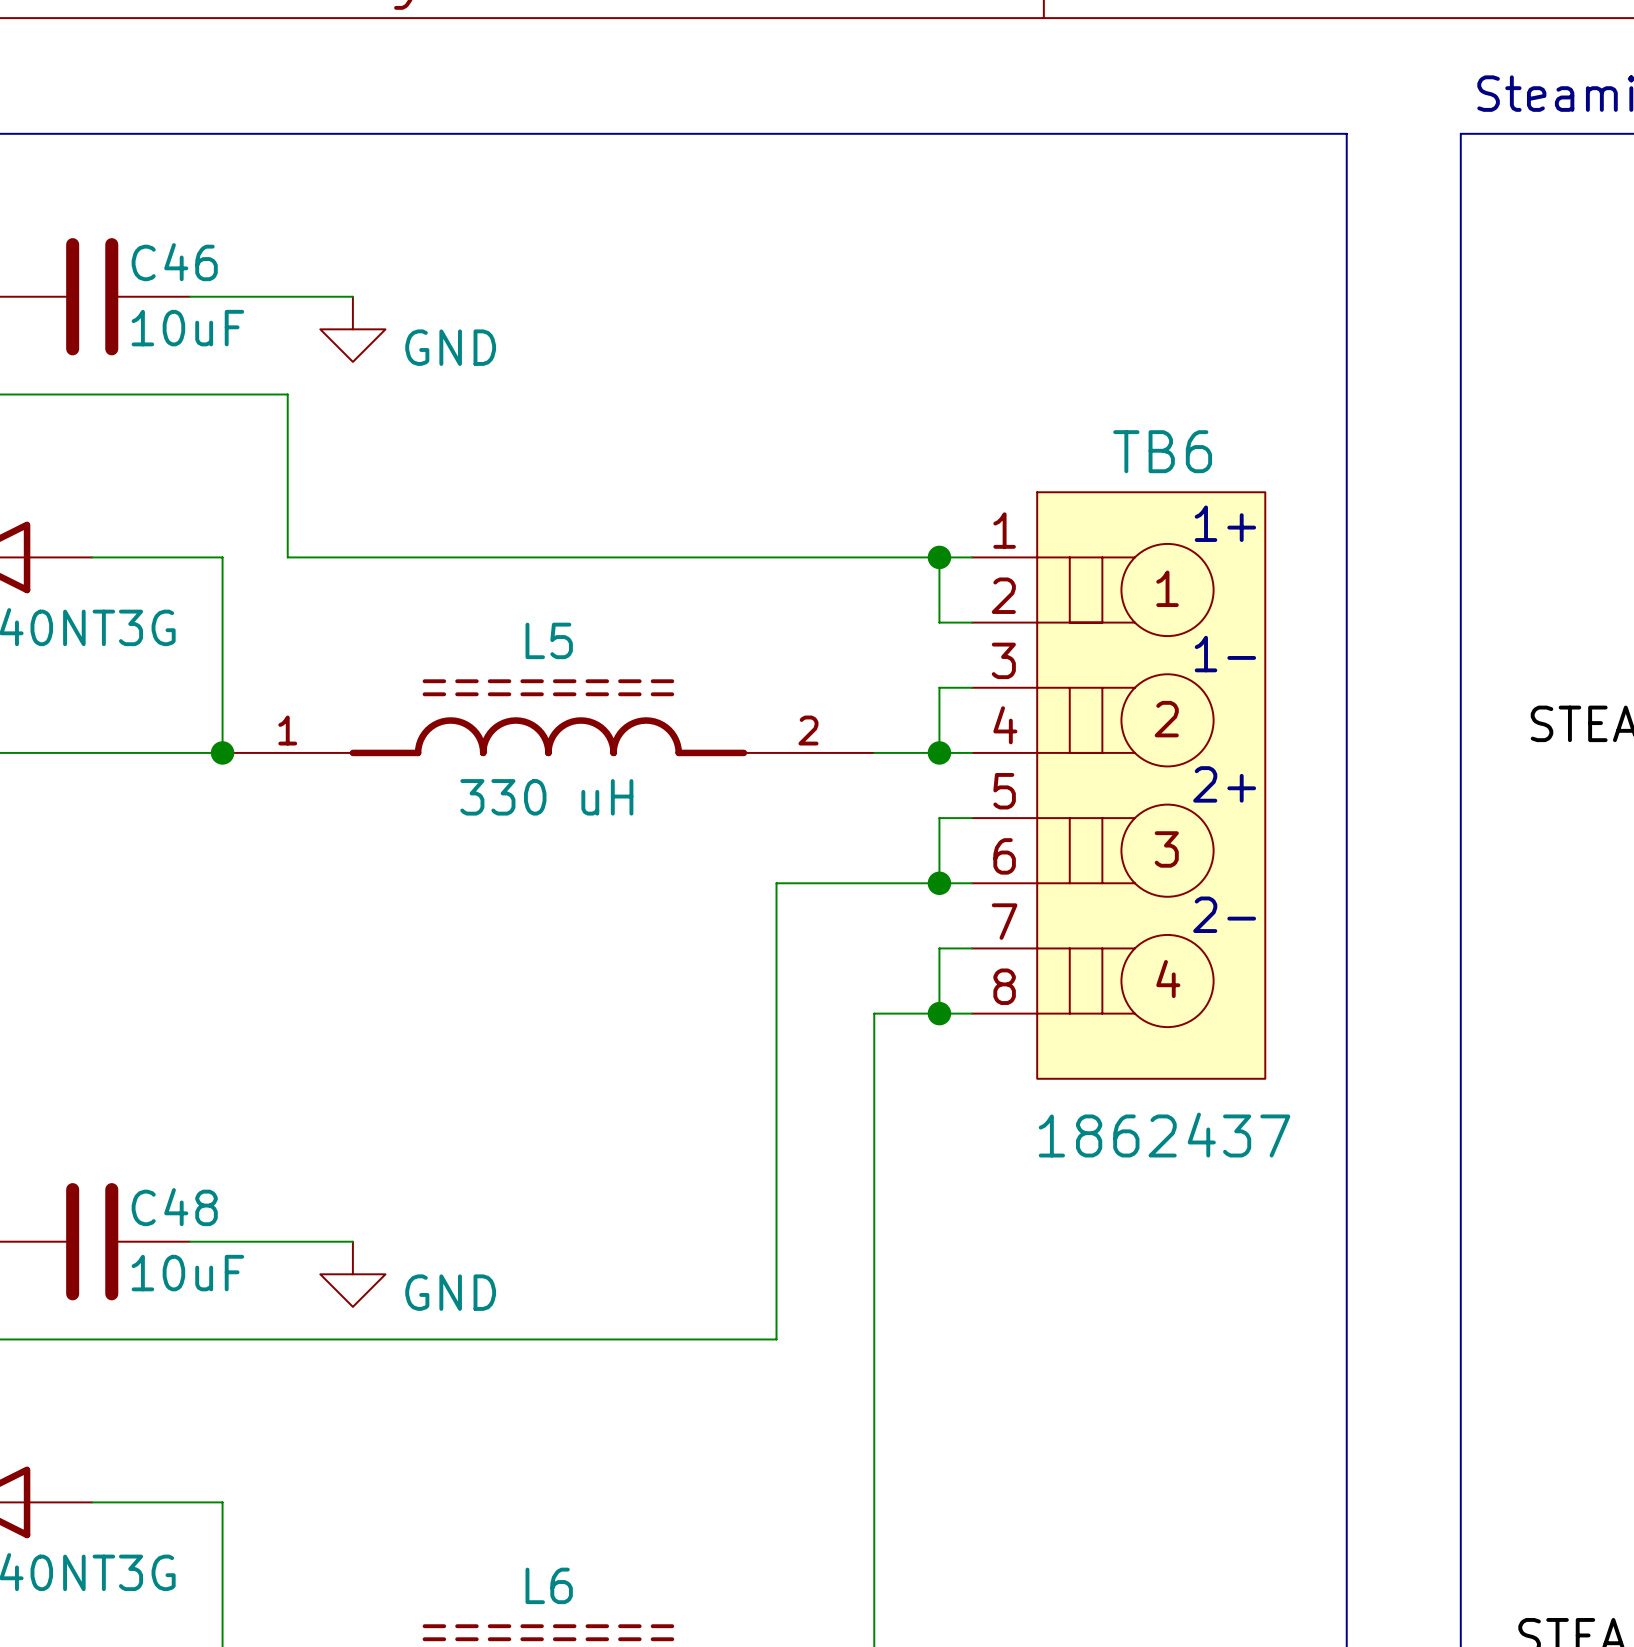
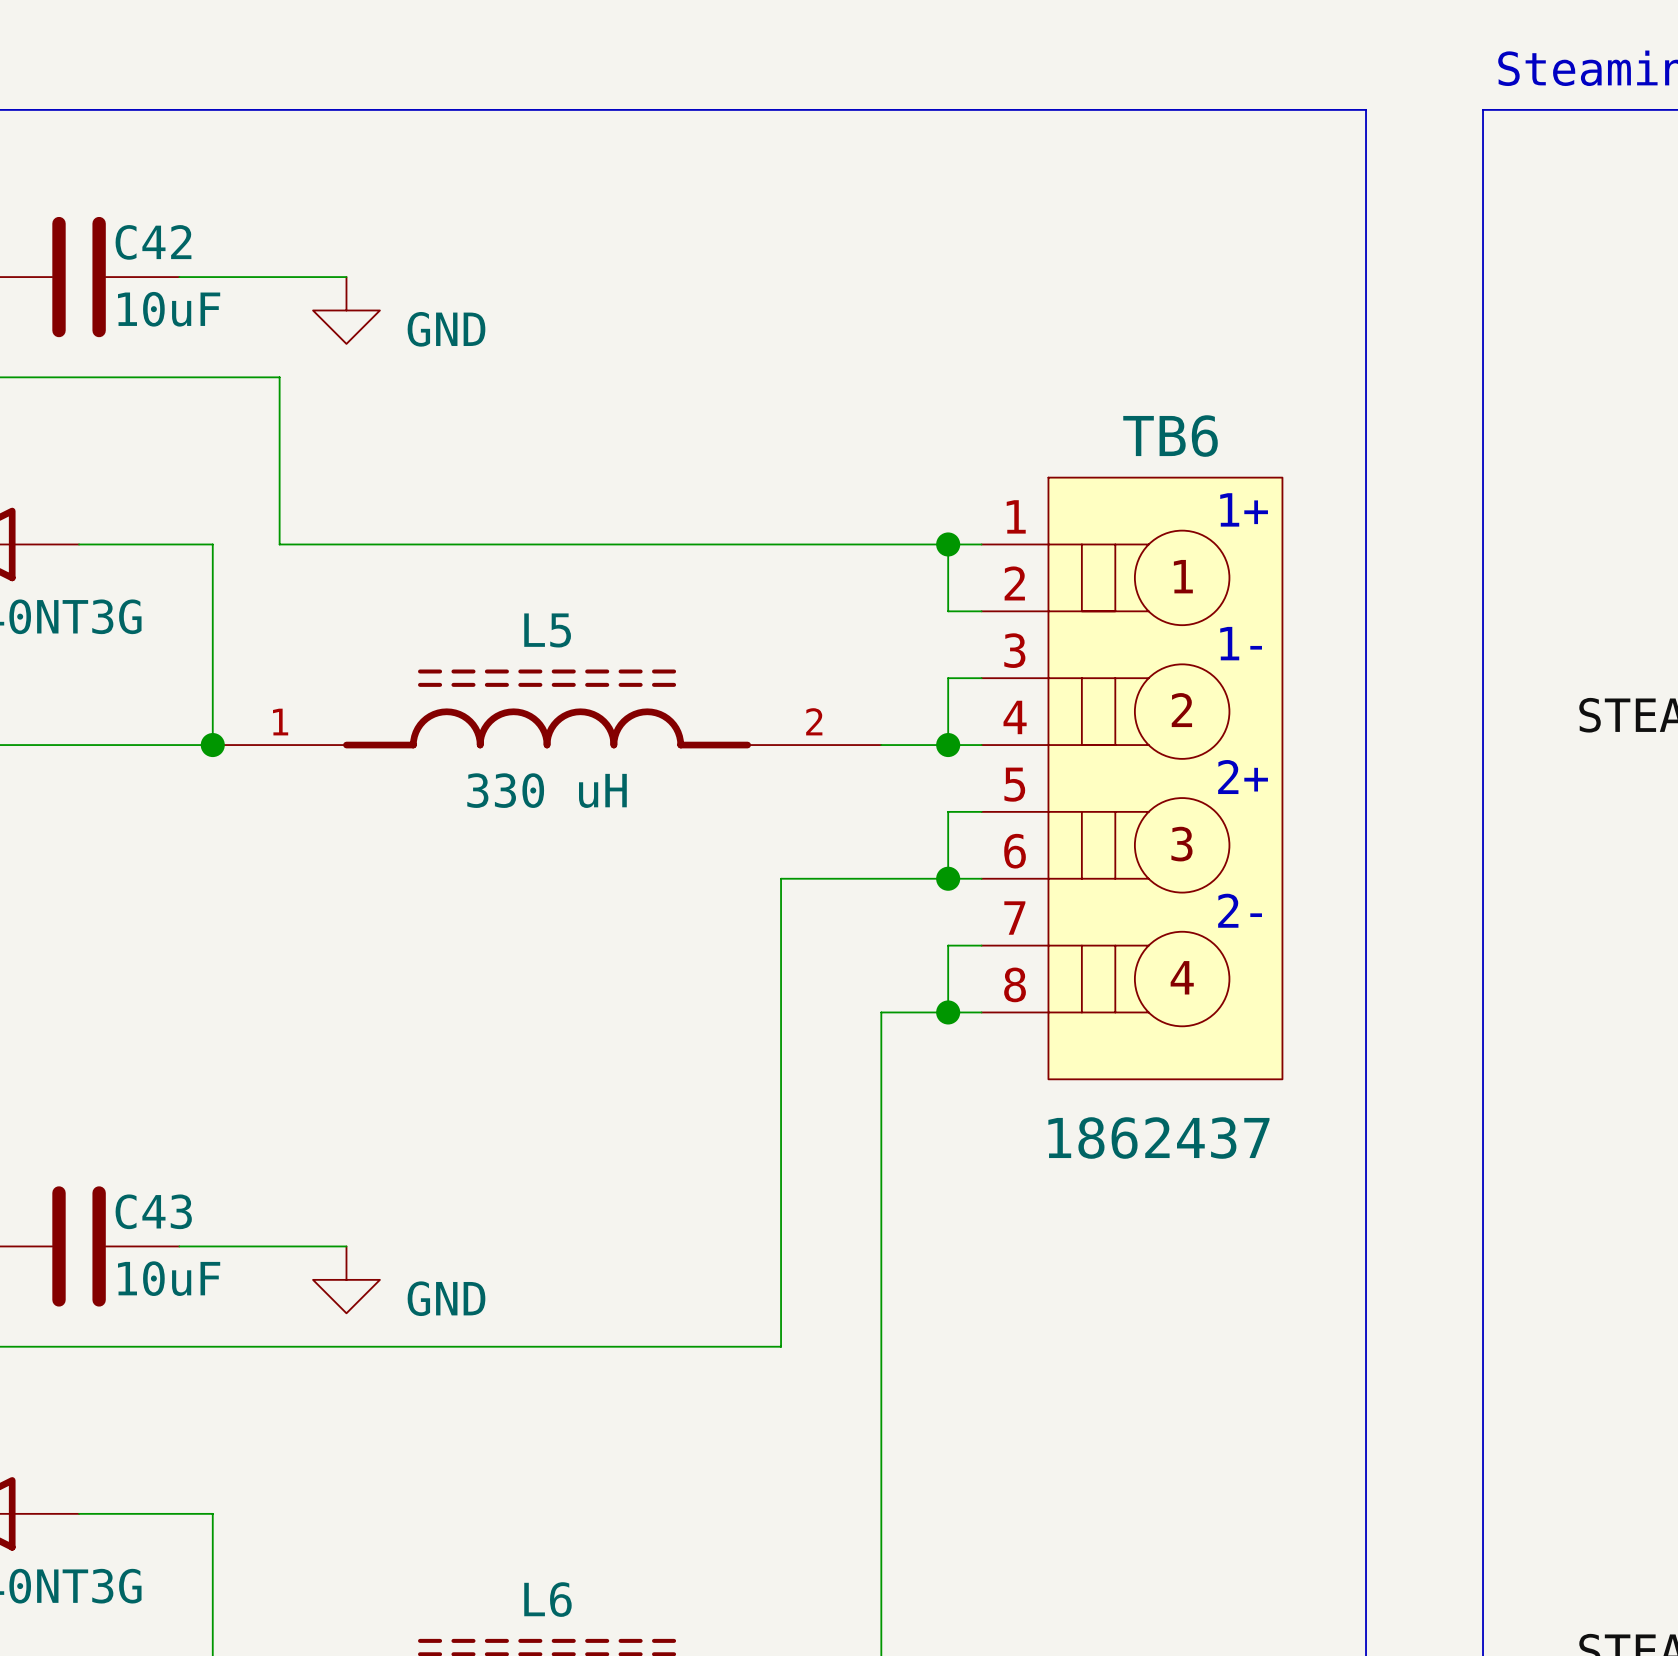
C46 name: C46 (174, 262) -> C42 (153, 242)
C48 name: C48 (174, 1207) -> C43 (153, 1211)

